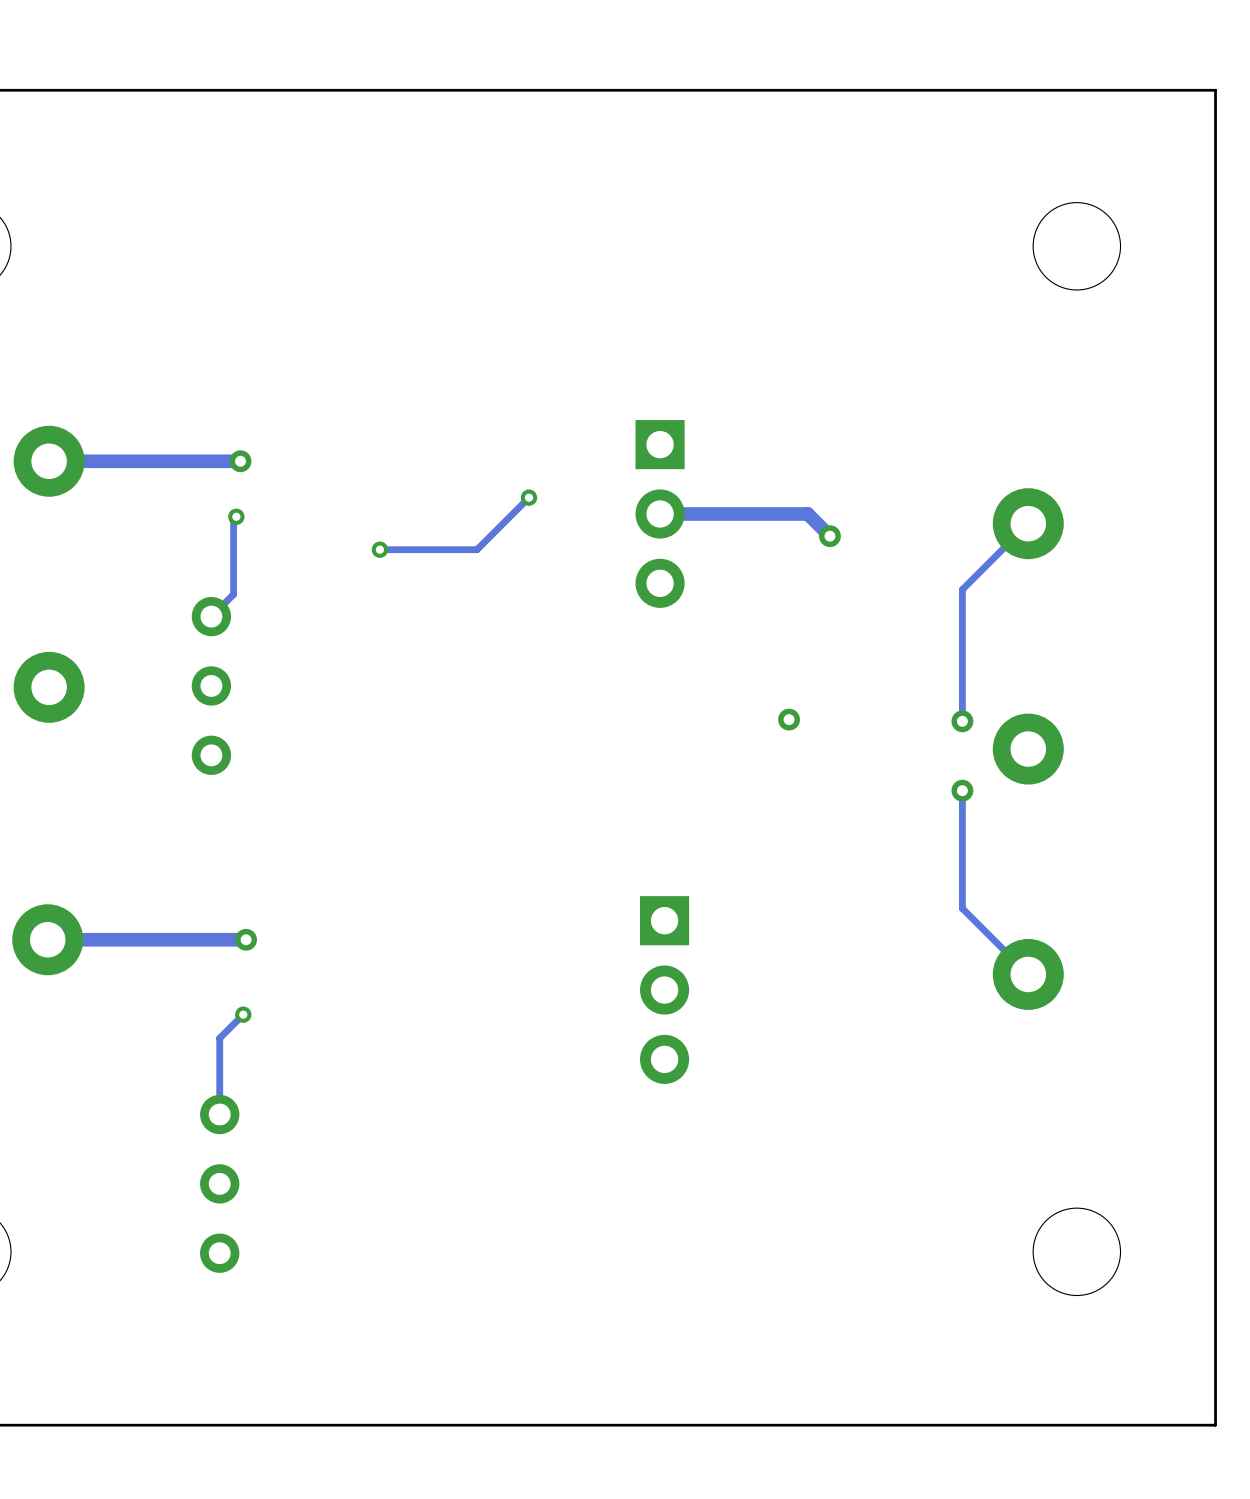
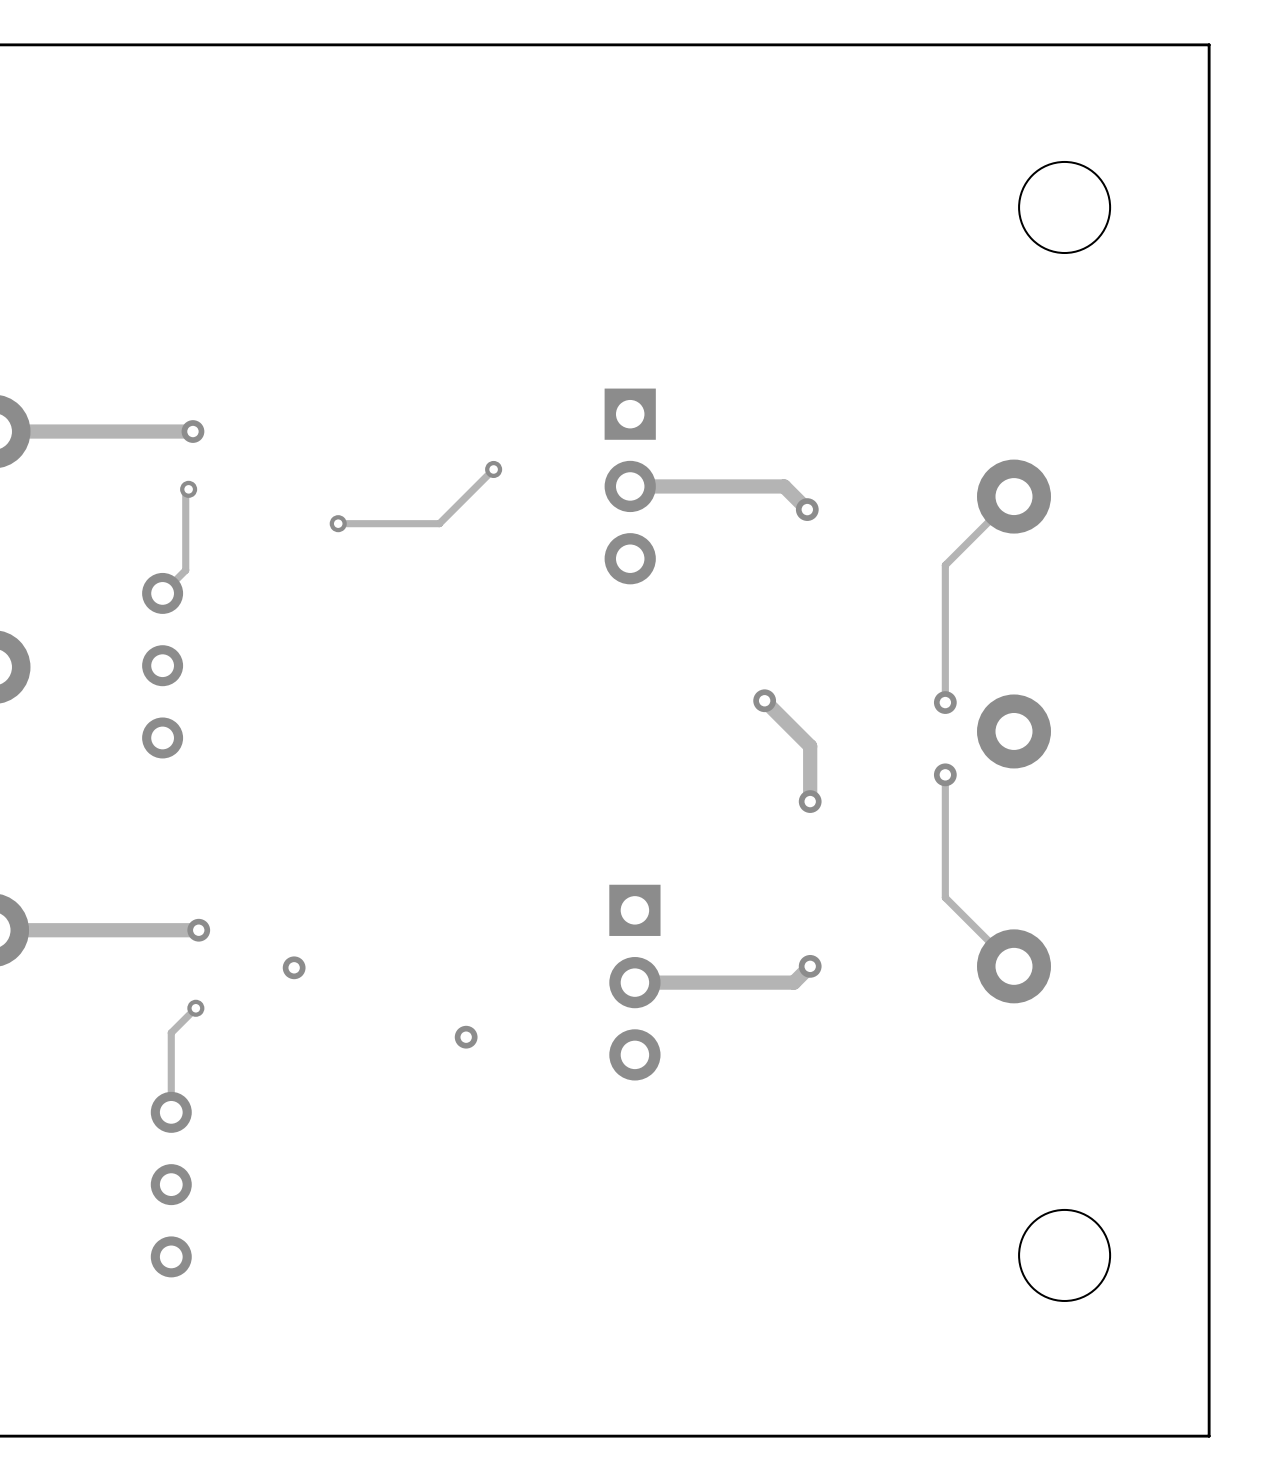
track: none -> (764, 700) (810, 746) (810, 801)
via: none -> (810, 801)
track: none -> (810, 966) (793, 982) (634, 982)
via: none -> (810, 966)
via: none -> (294, 967)
via: none -> (466, 1037)

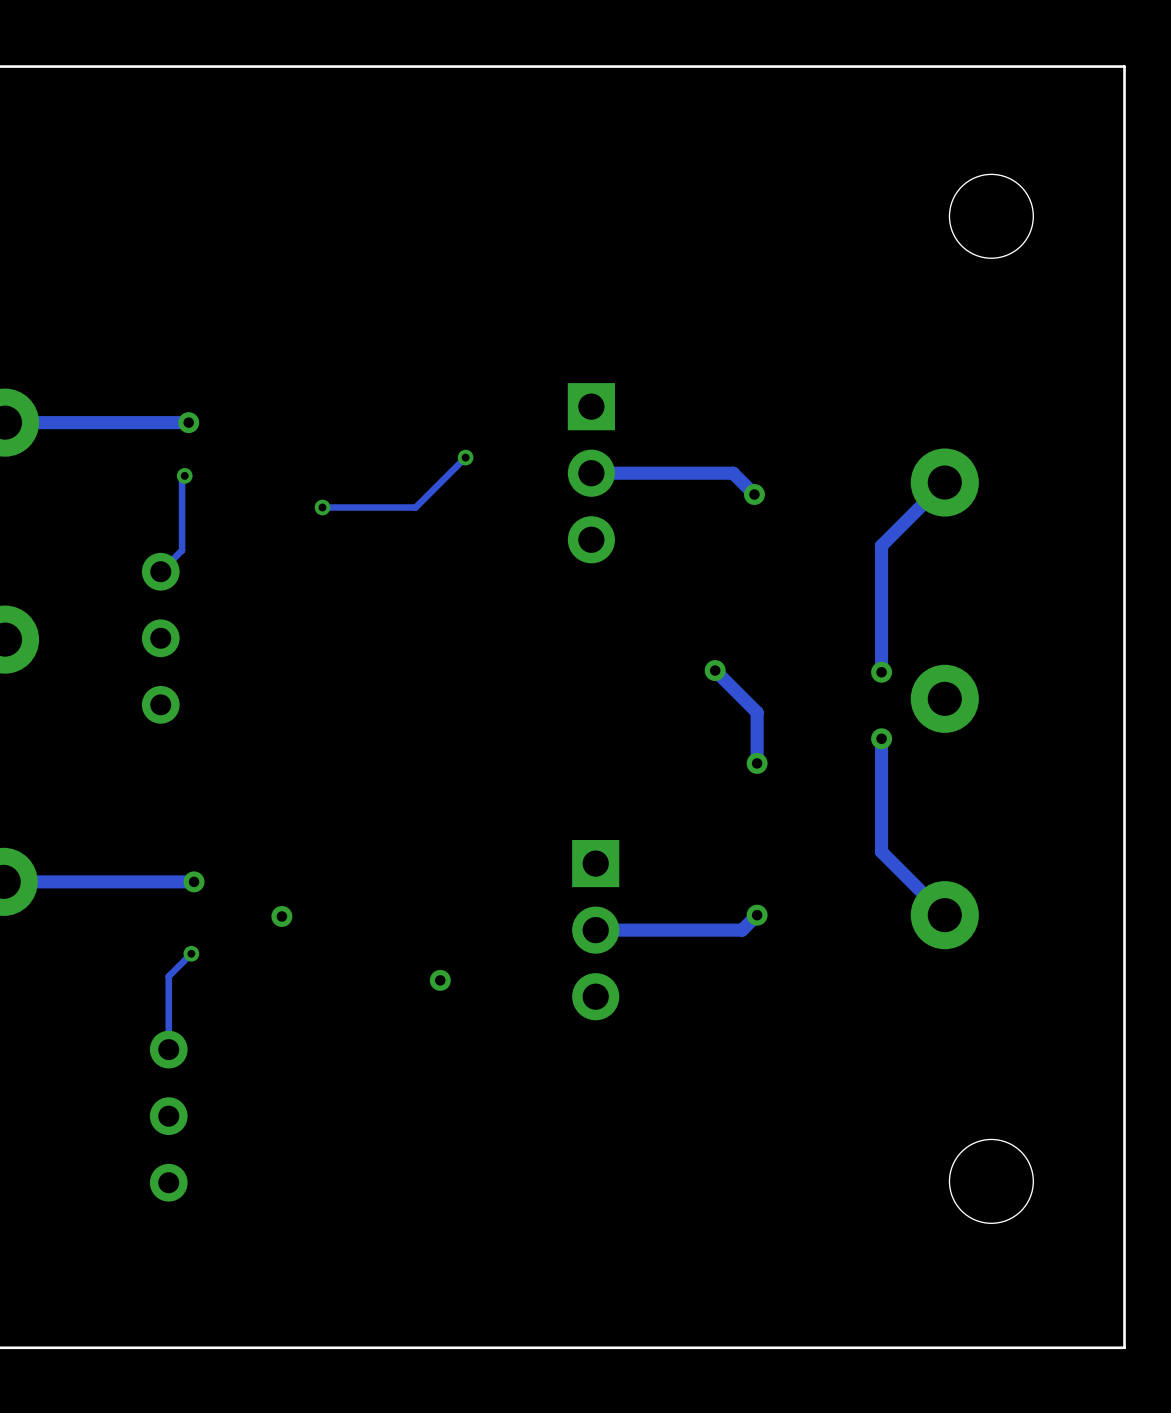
track width: thin (1014, 496) (945, 565) (945, 702) -> thick (944, 482) (881, 545) (881, 672)
track width: thin (945, 774) (945, 897) (1014, 966) -> thick (881, 738) (881, 851) (944, 915)

